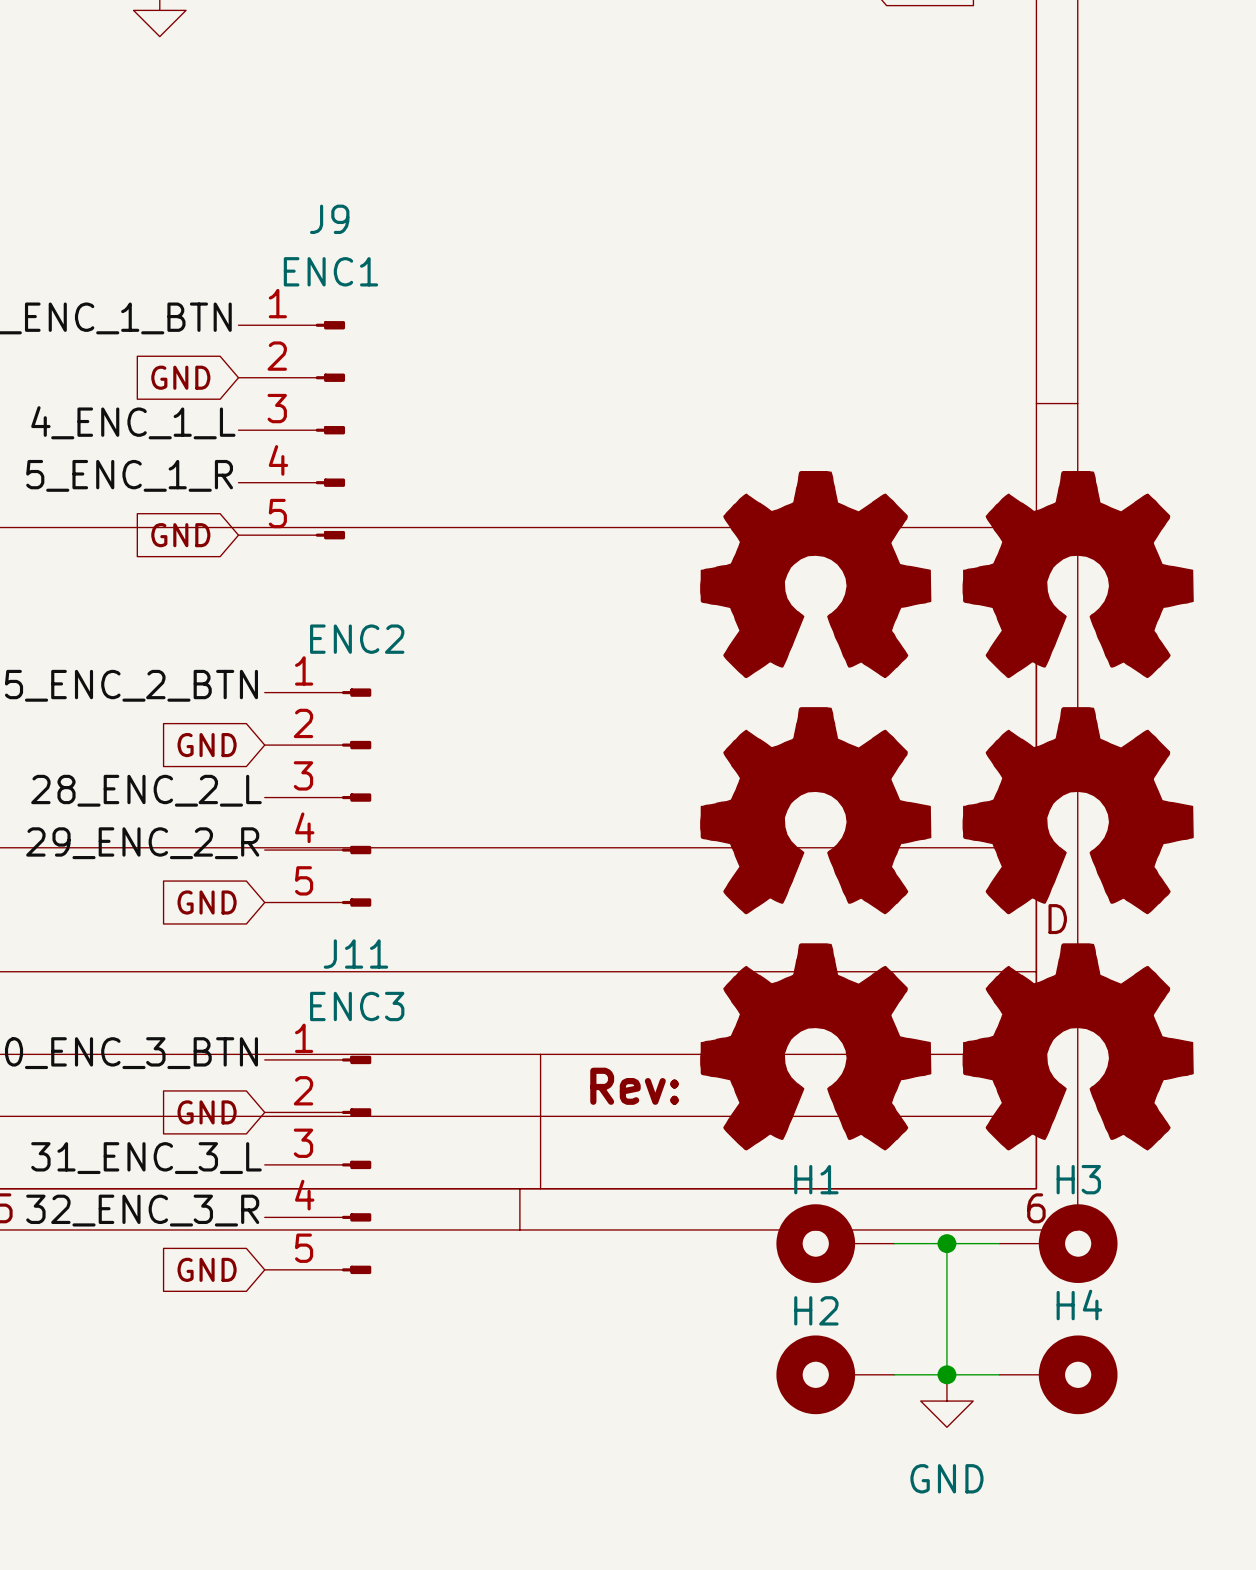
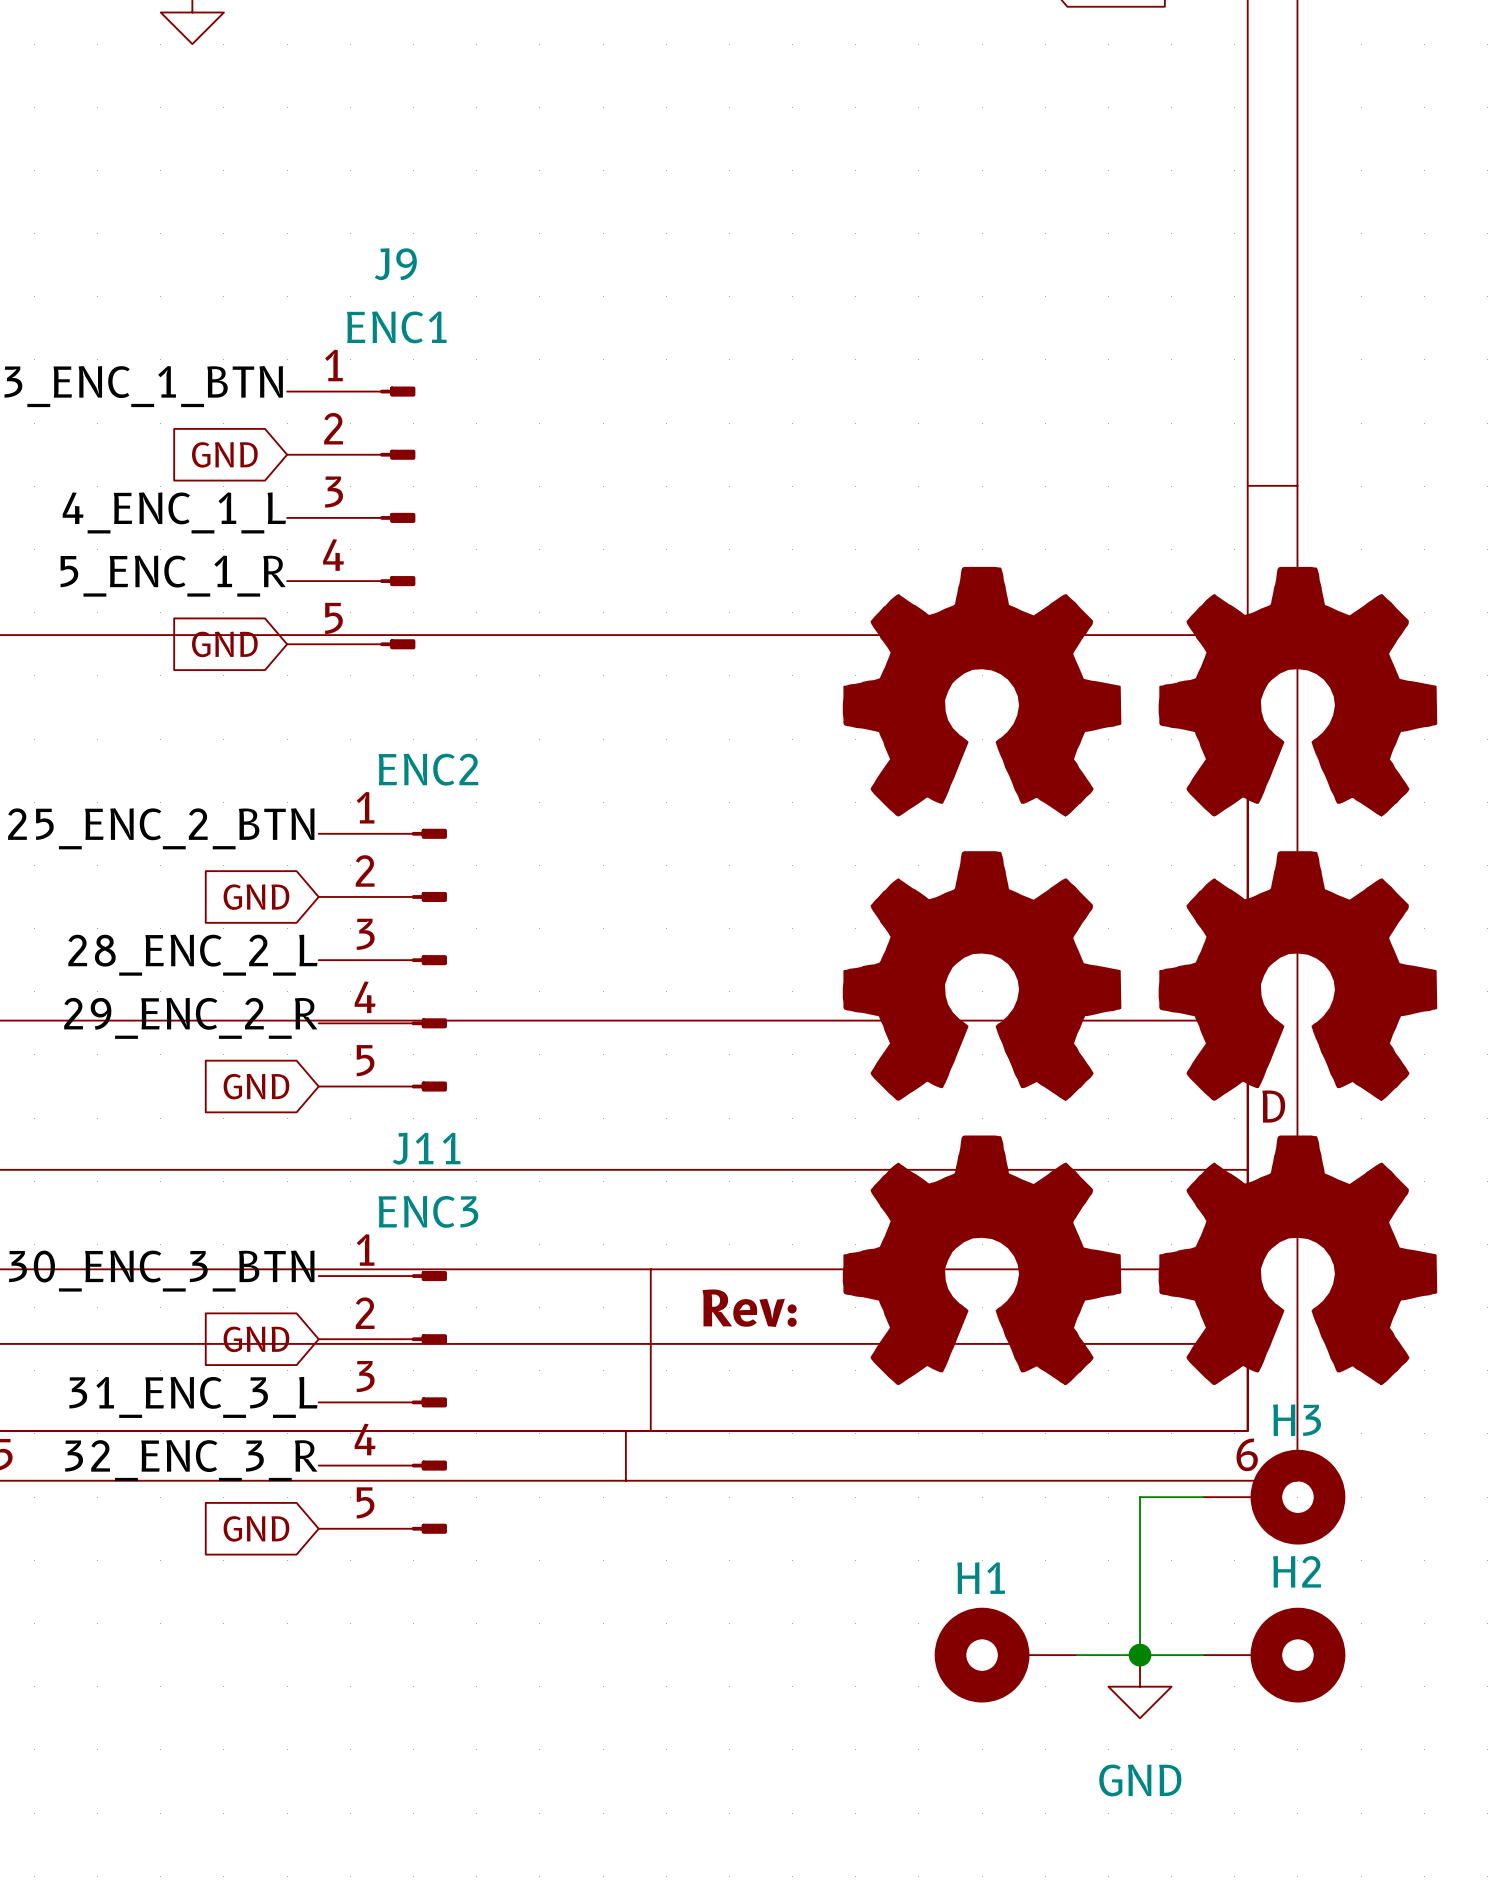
H1: (835, 1243) -> none
wire: (894, 1243) (946, 1243) -> none
junction: (946, 1243) -> none
H4 name: H4 (1079, 1304) -> H2 (1296, 1571)
H2 name: H2 (816, 1310) -> H1 (981, 1578)

